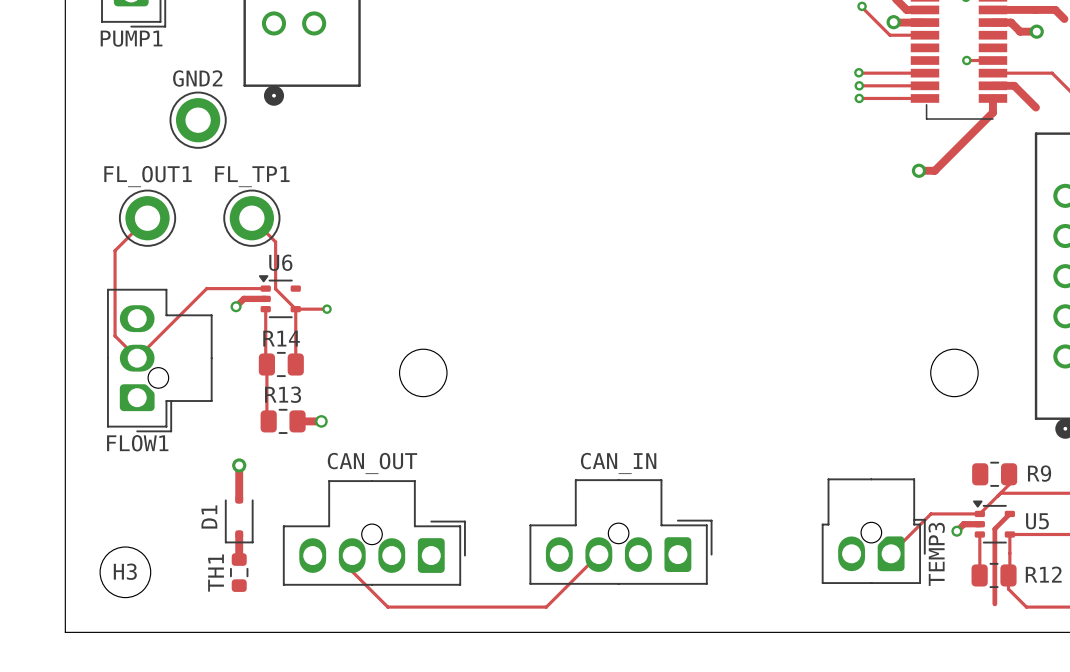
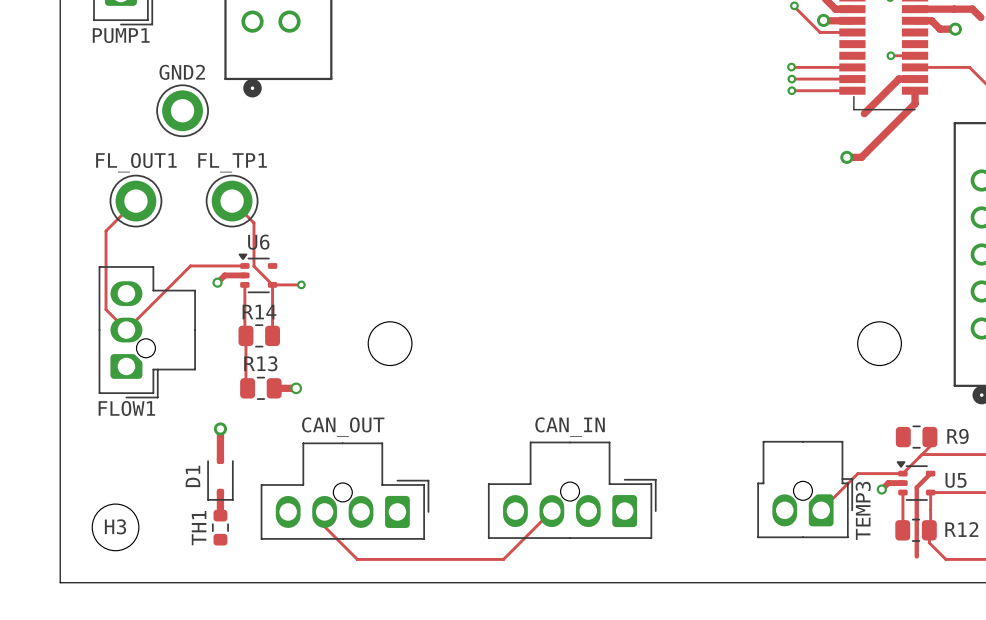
track: (992, 85) (1014, 85) (1035, 107) -> (915, 79) (898, 79) (864, 113)

